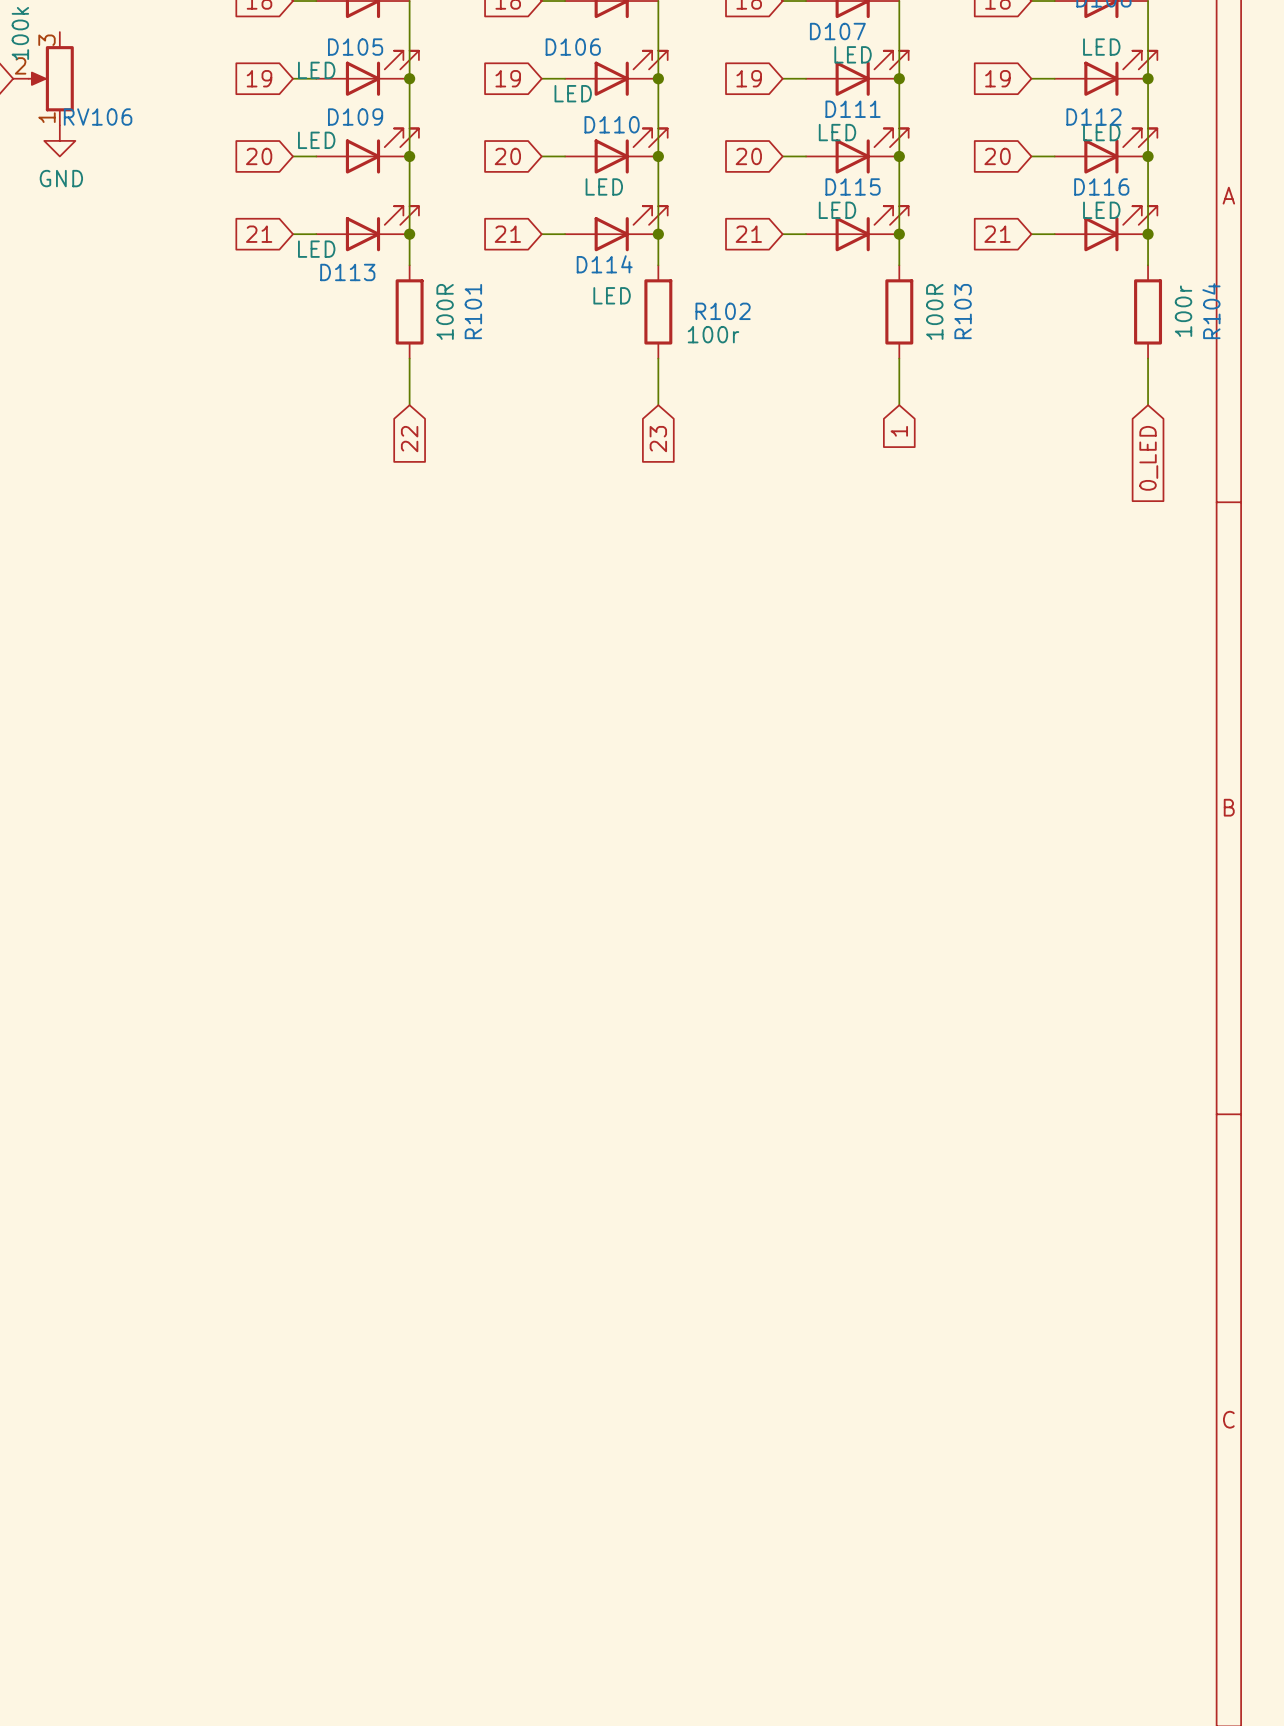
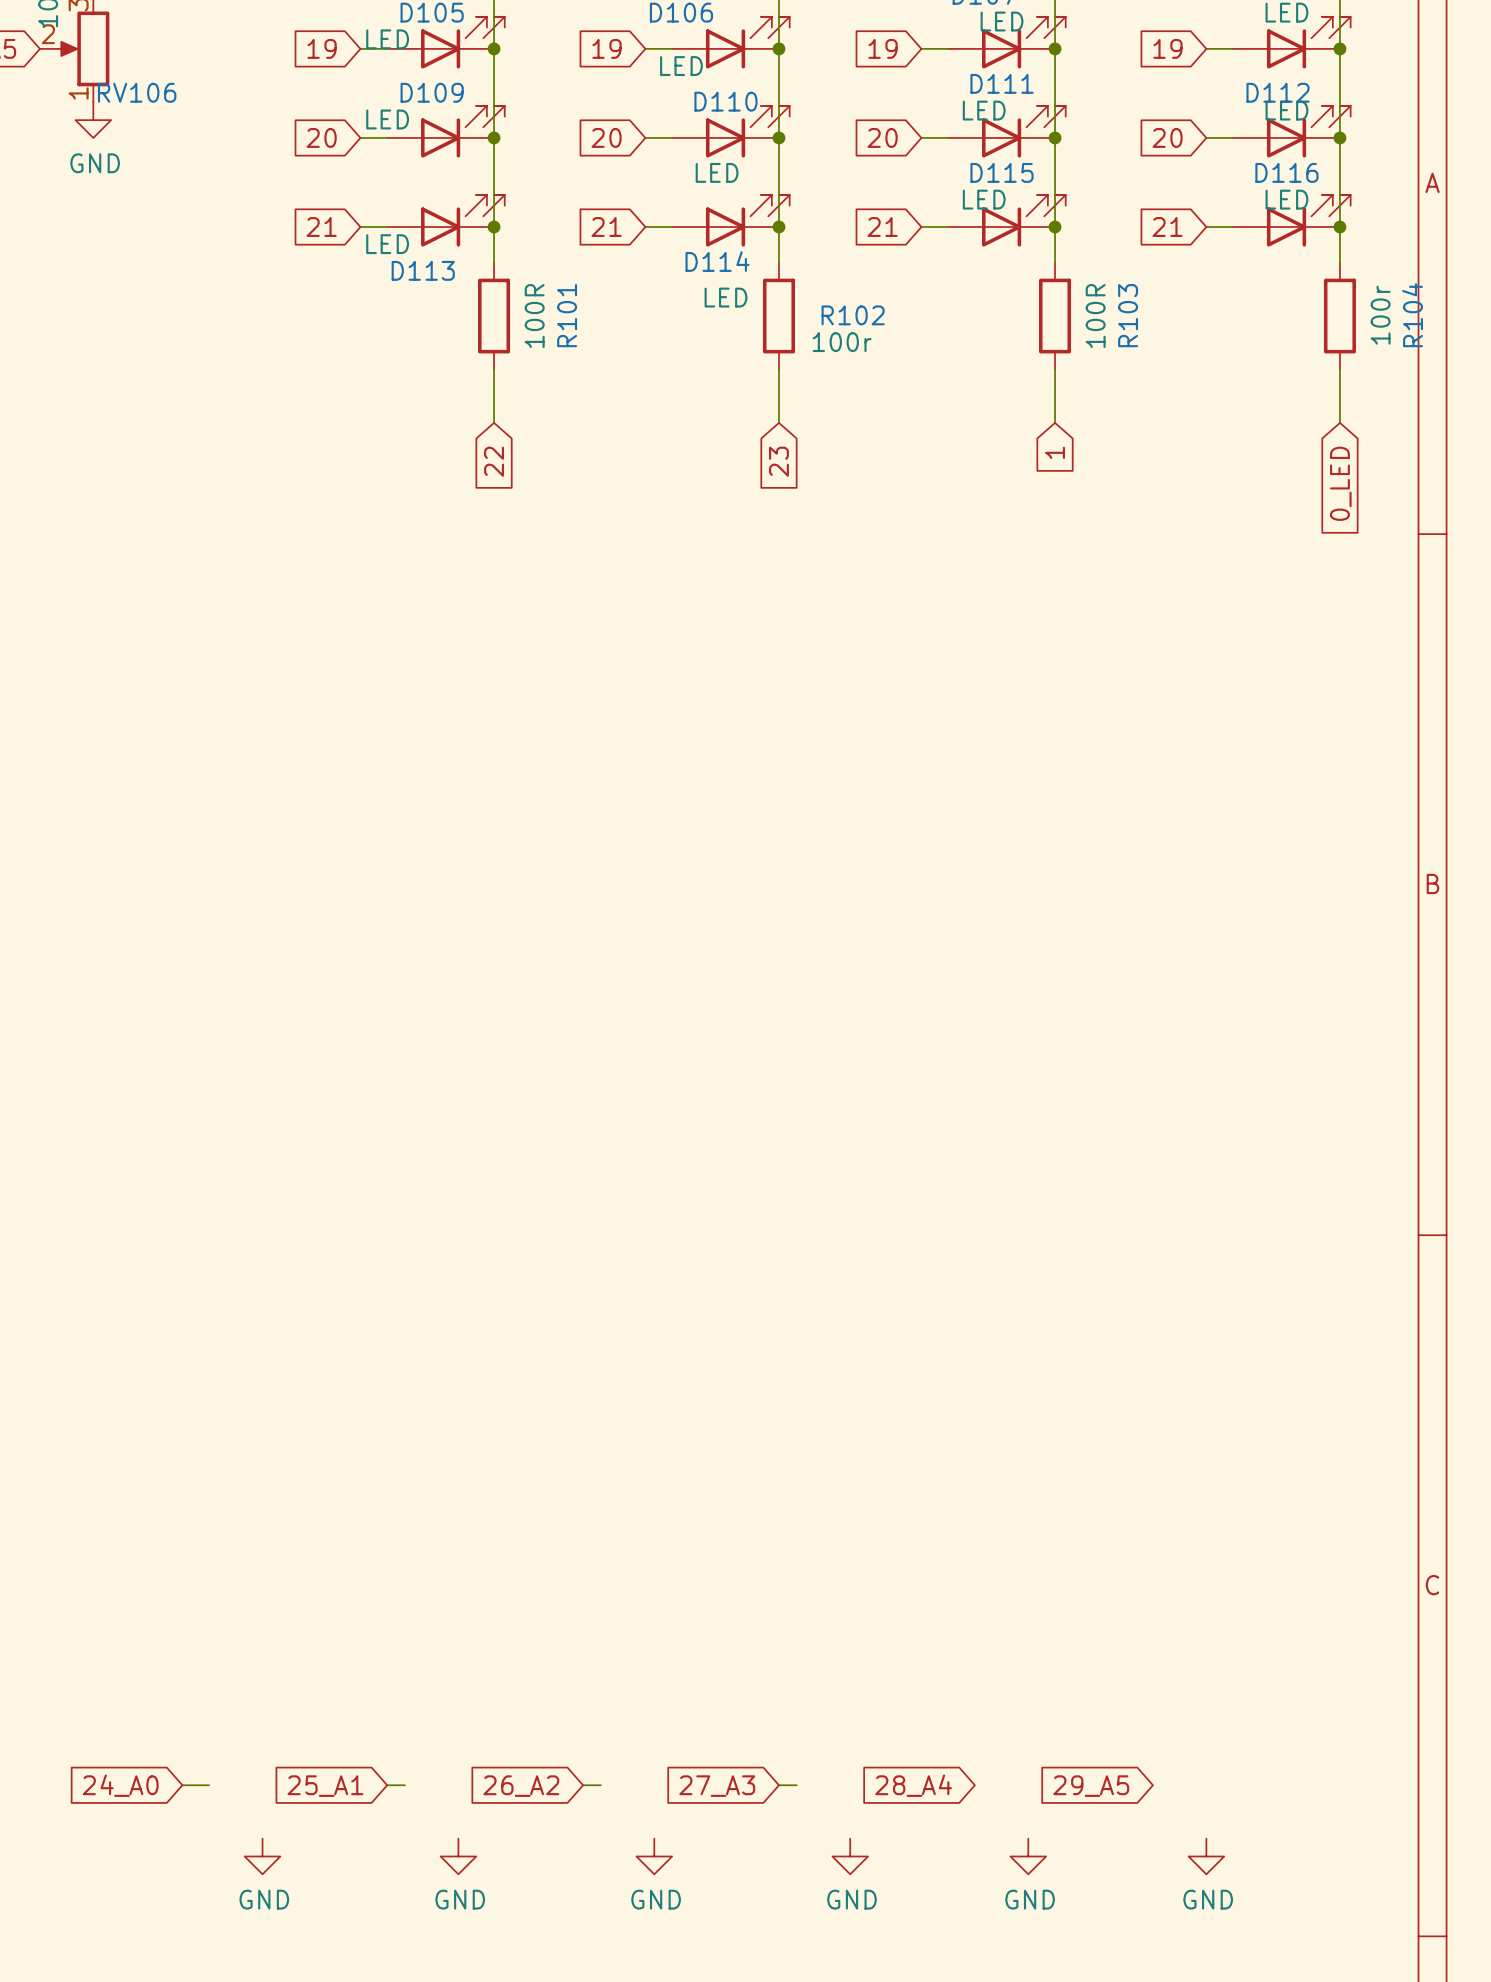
global label: none -> 24_A0 (120, 1785)
wire: none -> (182, 1785) (209, 1785)
wire: none -> (387, 1785) (405, 1785)
wire: none -> (583, 1785) (600, 1785)
wire: none -> (778, 1785) (796, 1785)
global label: none -> 28_A4 (913, 1785)
global label: none -> 25_A1 (325, 1786)
global label: none -> 26_A2 (521, 1786)
global label: none -> 27_A3 (717, 1786)
global label: none -> 29_A5 (1091, 1786)
power symbol: none -> GND (262, 1856)
power symbol: none -> GND (458, 1856)
power symbol: none -> GND (654, 1856)
power symbol: none -> GND (850, 1856)
power symbol: none -> GND (1028, 1856)
power symbol: none -> GND (1206, 1856)

